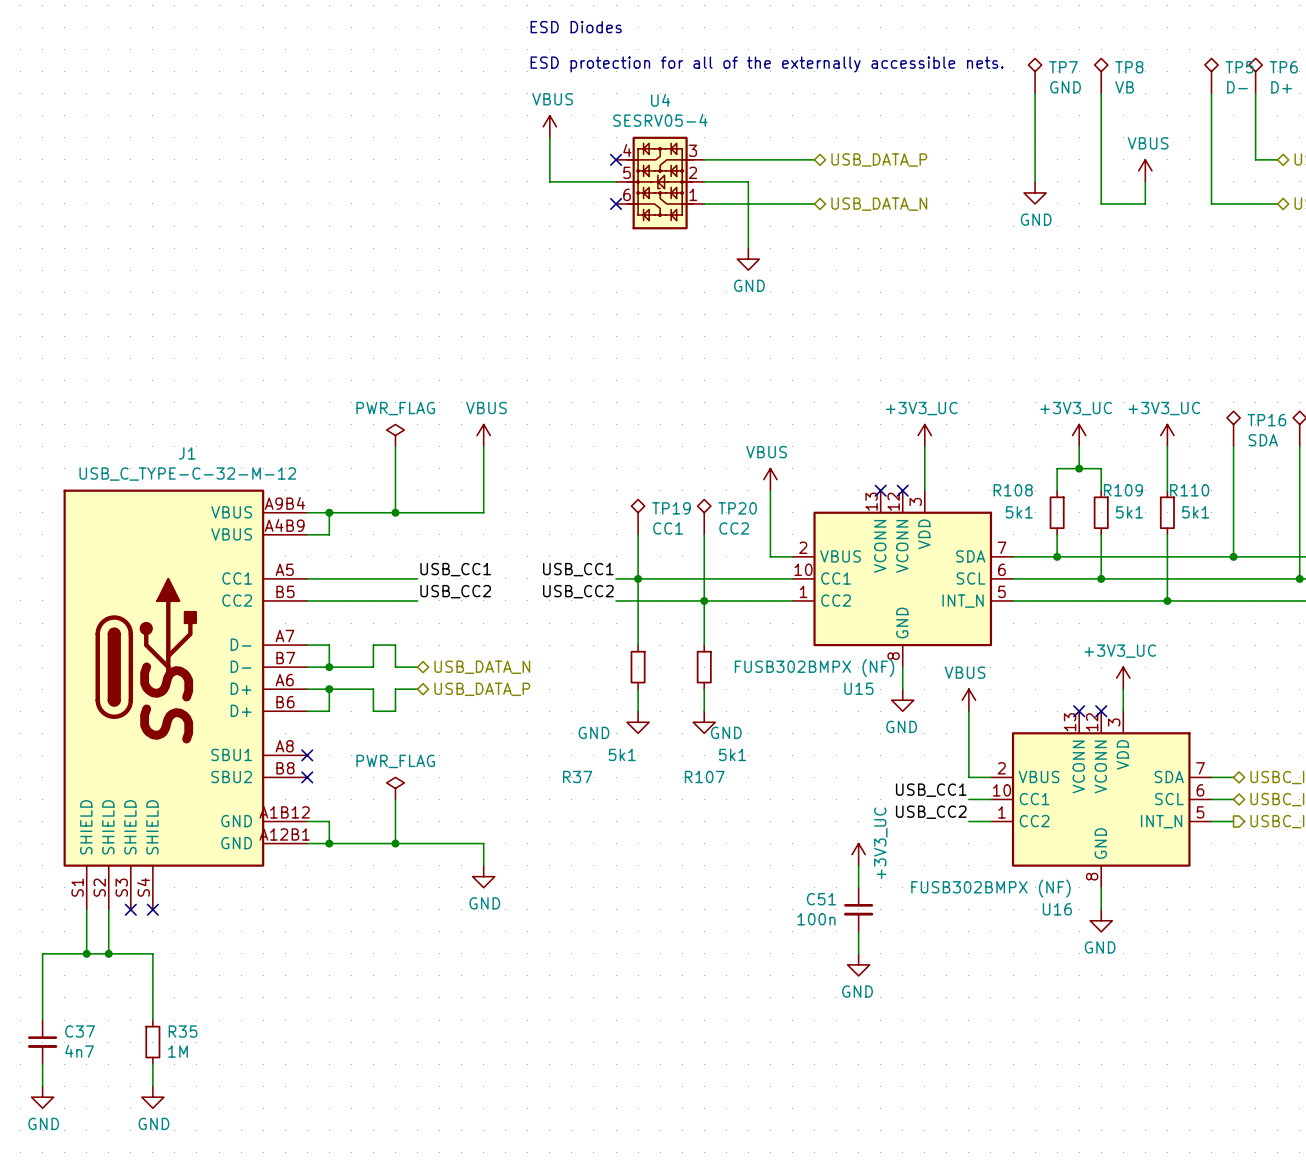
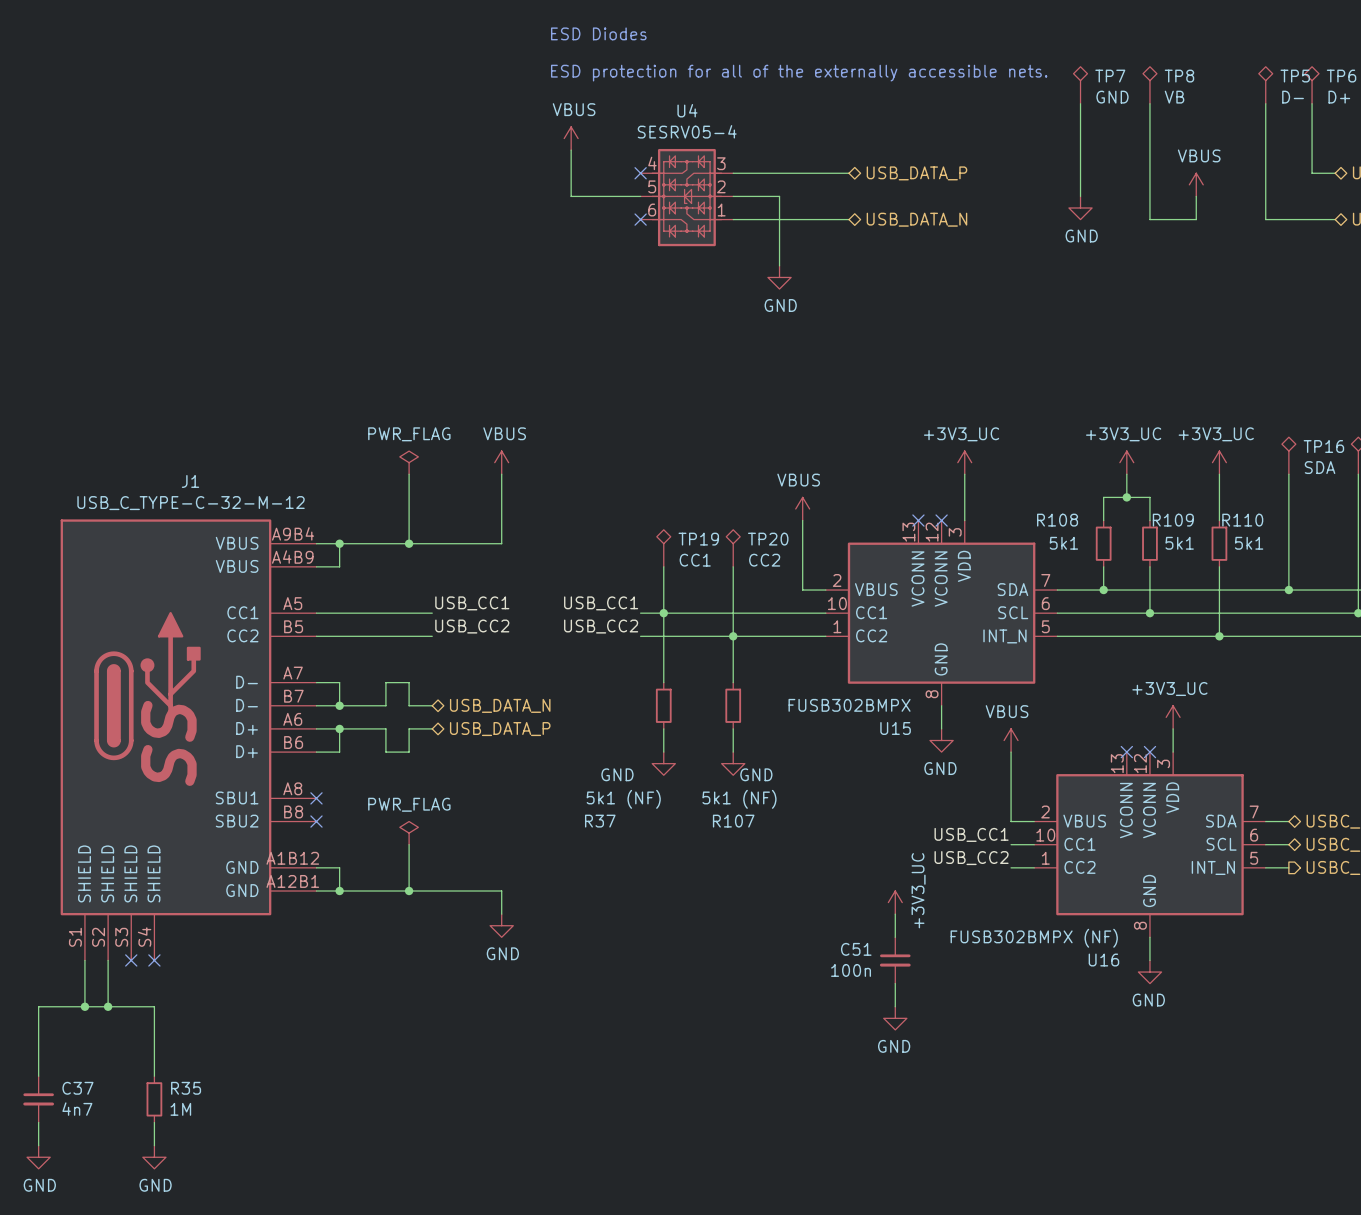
U15 value: FUSB302BMPX (NF) (814, 668) -> FUSB302BMPX (849, 705)
R37 value: 5k1 (622, 754) -> 5k1 (NF) (623, 799)
R107 value: 5k1 (732, 754) -> 5k1 (NF) (739, 799)

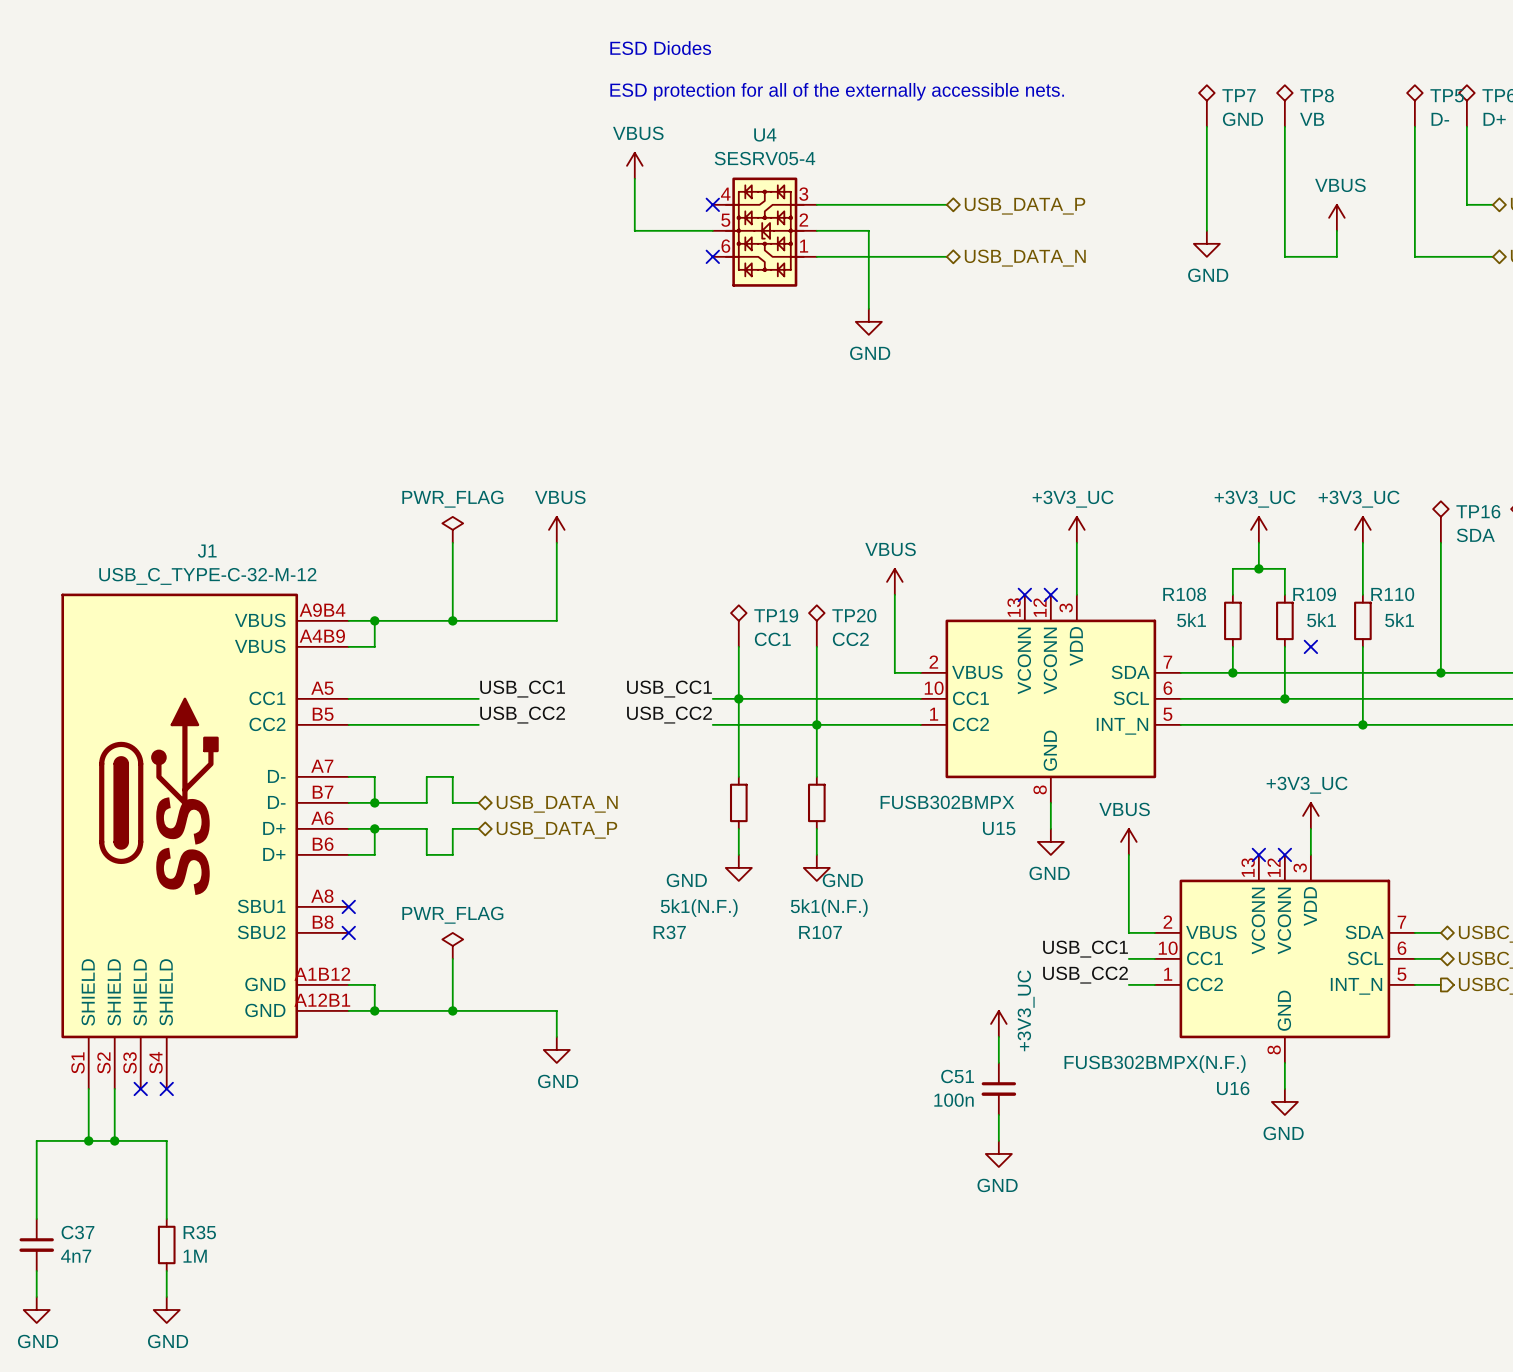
no-connect mark: none -> (1310, 646)
R37 value: 5k1 (NF) (623, 799) -> 5k1(N.F.) (699, 908)
R107 value: 5k1 (NF) (739, 799) -> 5k1(N.F.) (829, 908)
U16 value: FUSB302BMPX (NF) (1034, 938) -> FUSB302BMPX(N.F.) (1155, 1064)

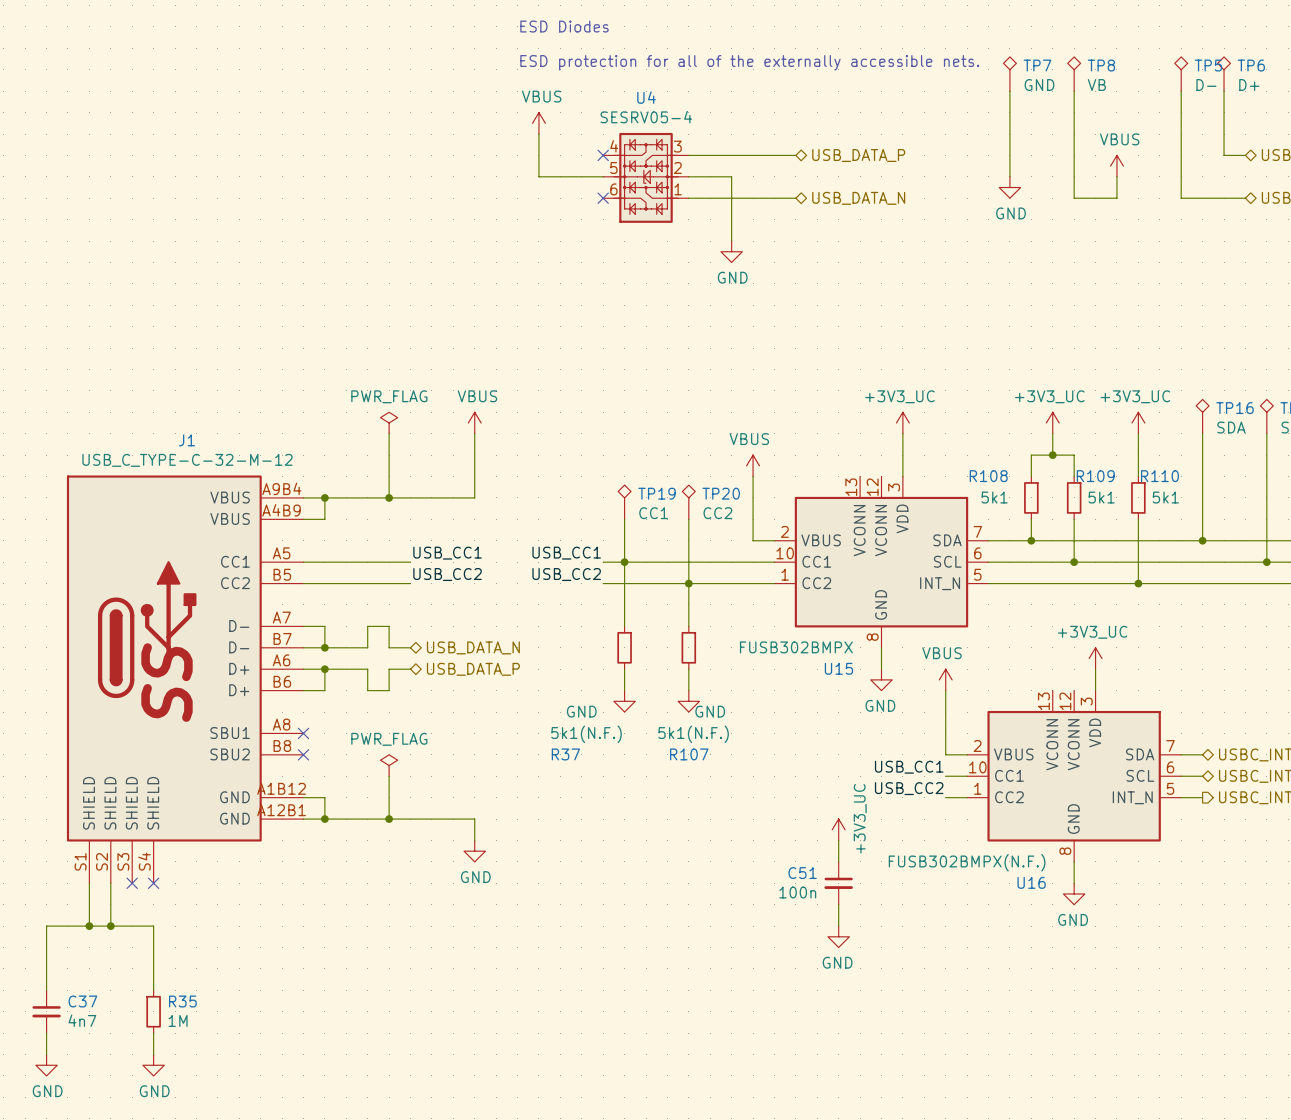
no-connect mark: (1024, 594) -> none
no-connect mark: (1050, 594) -> none
no-connect mark: (1310, 646) -> none
no-connect mark: (1258, 854) -> none
no-connect mark: (1284, 854) -> none

